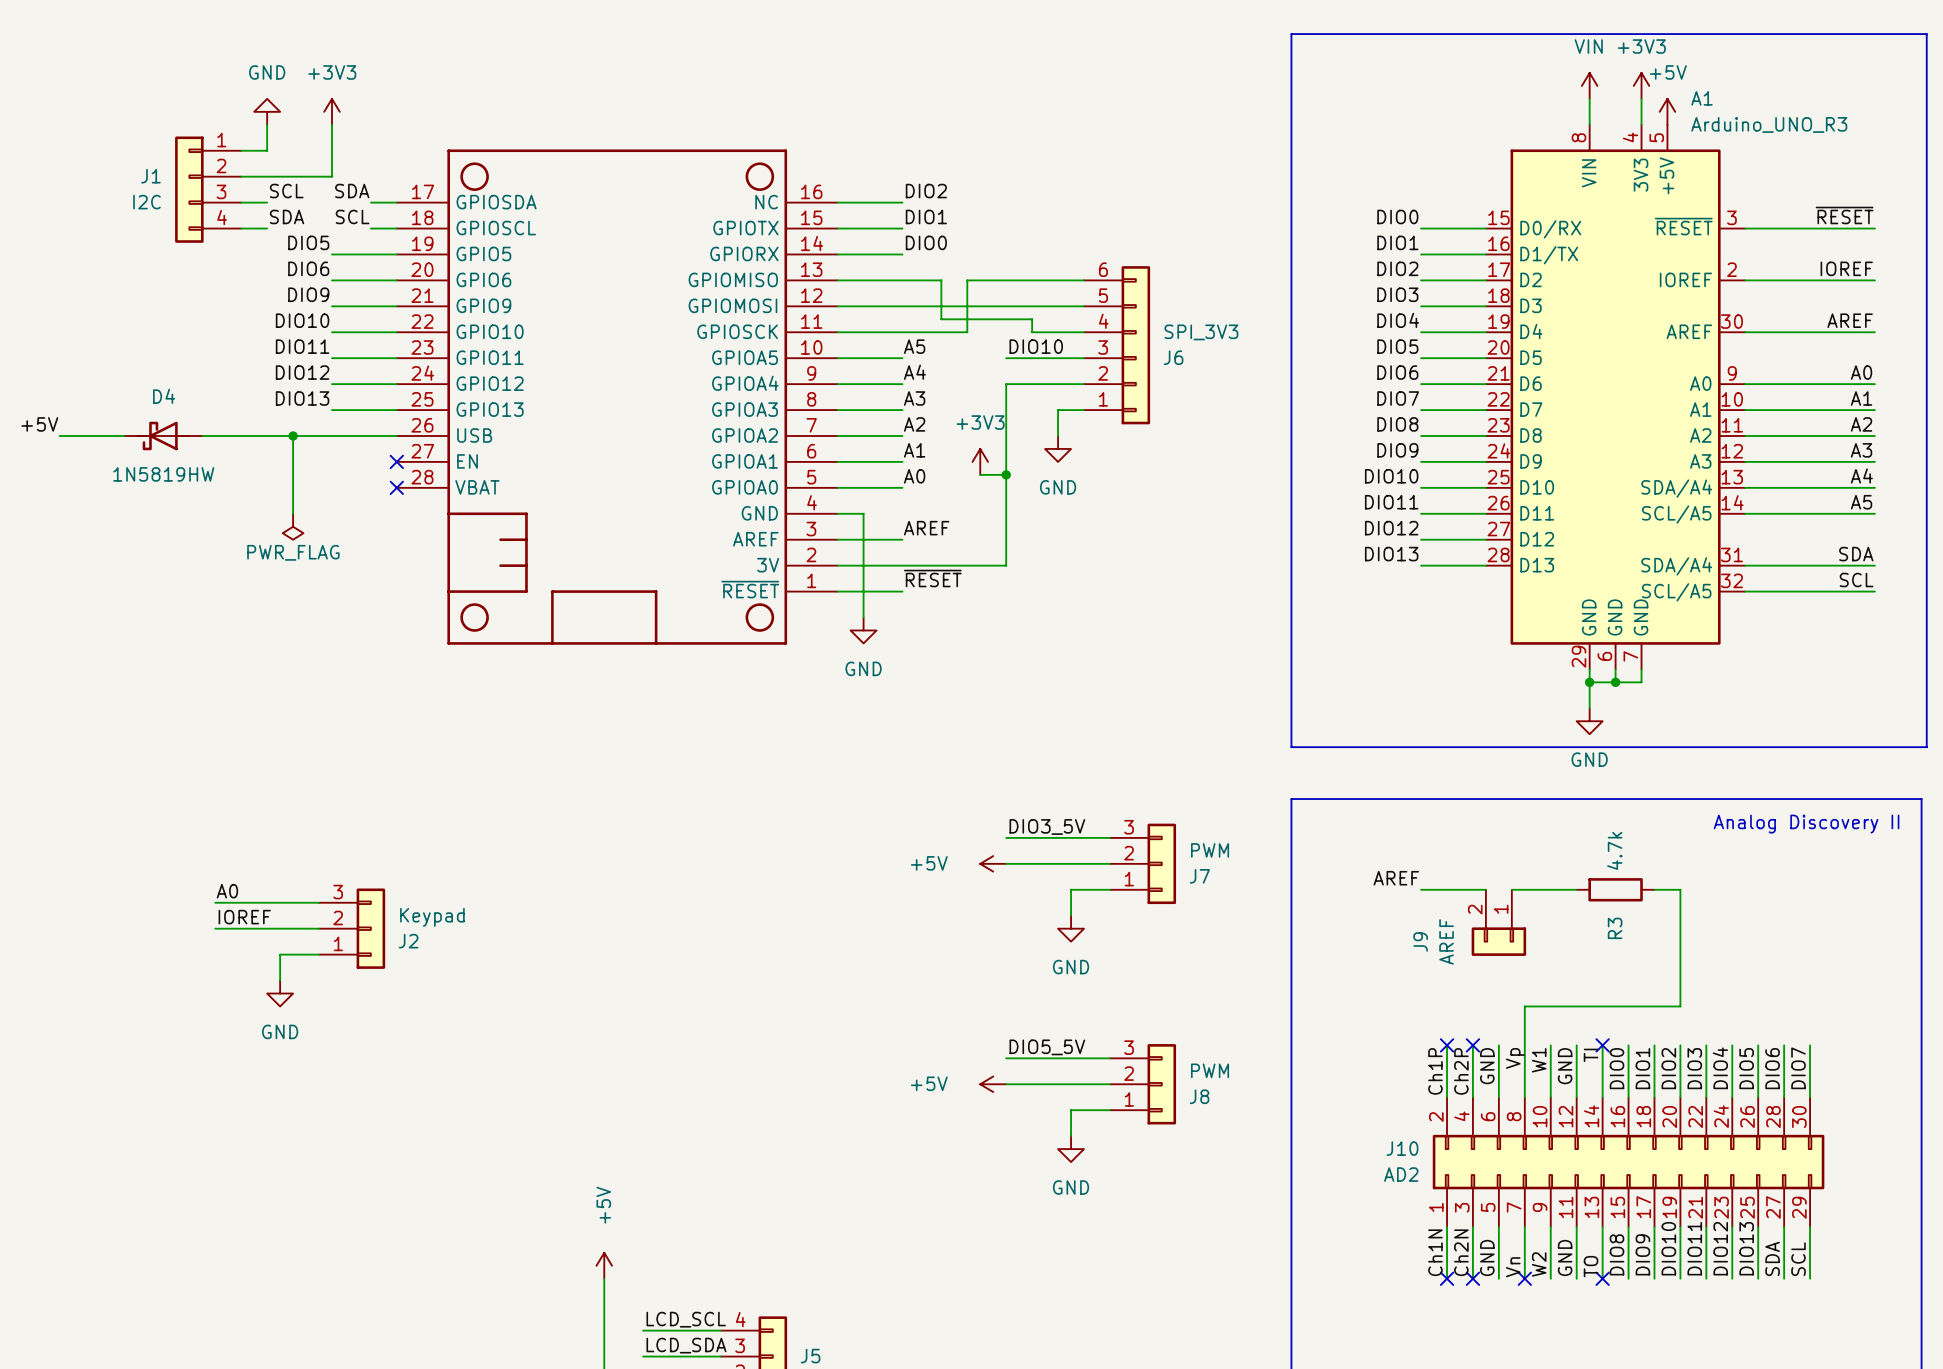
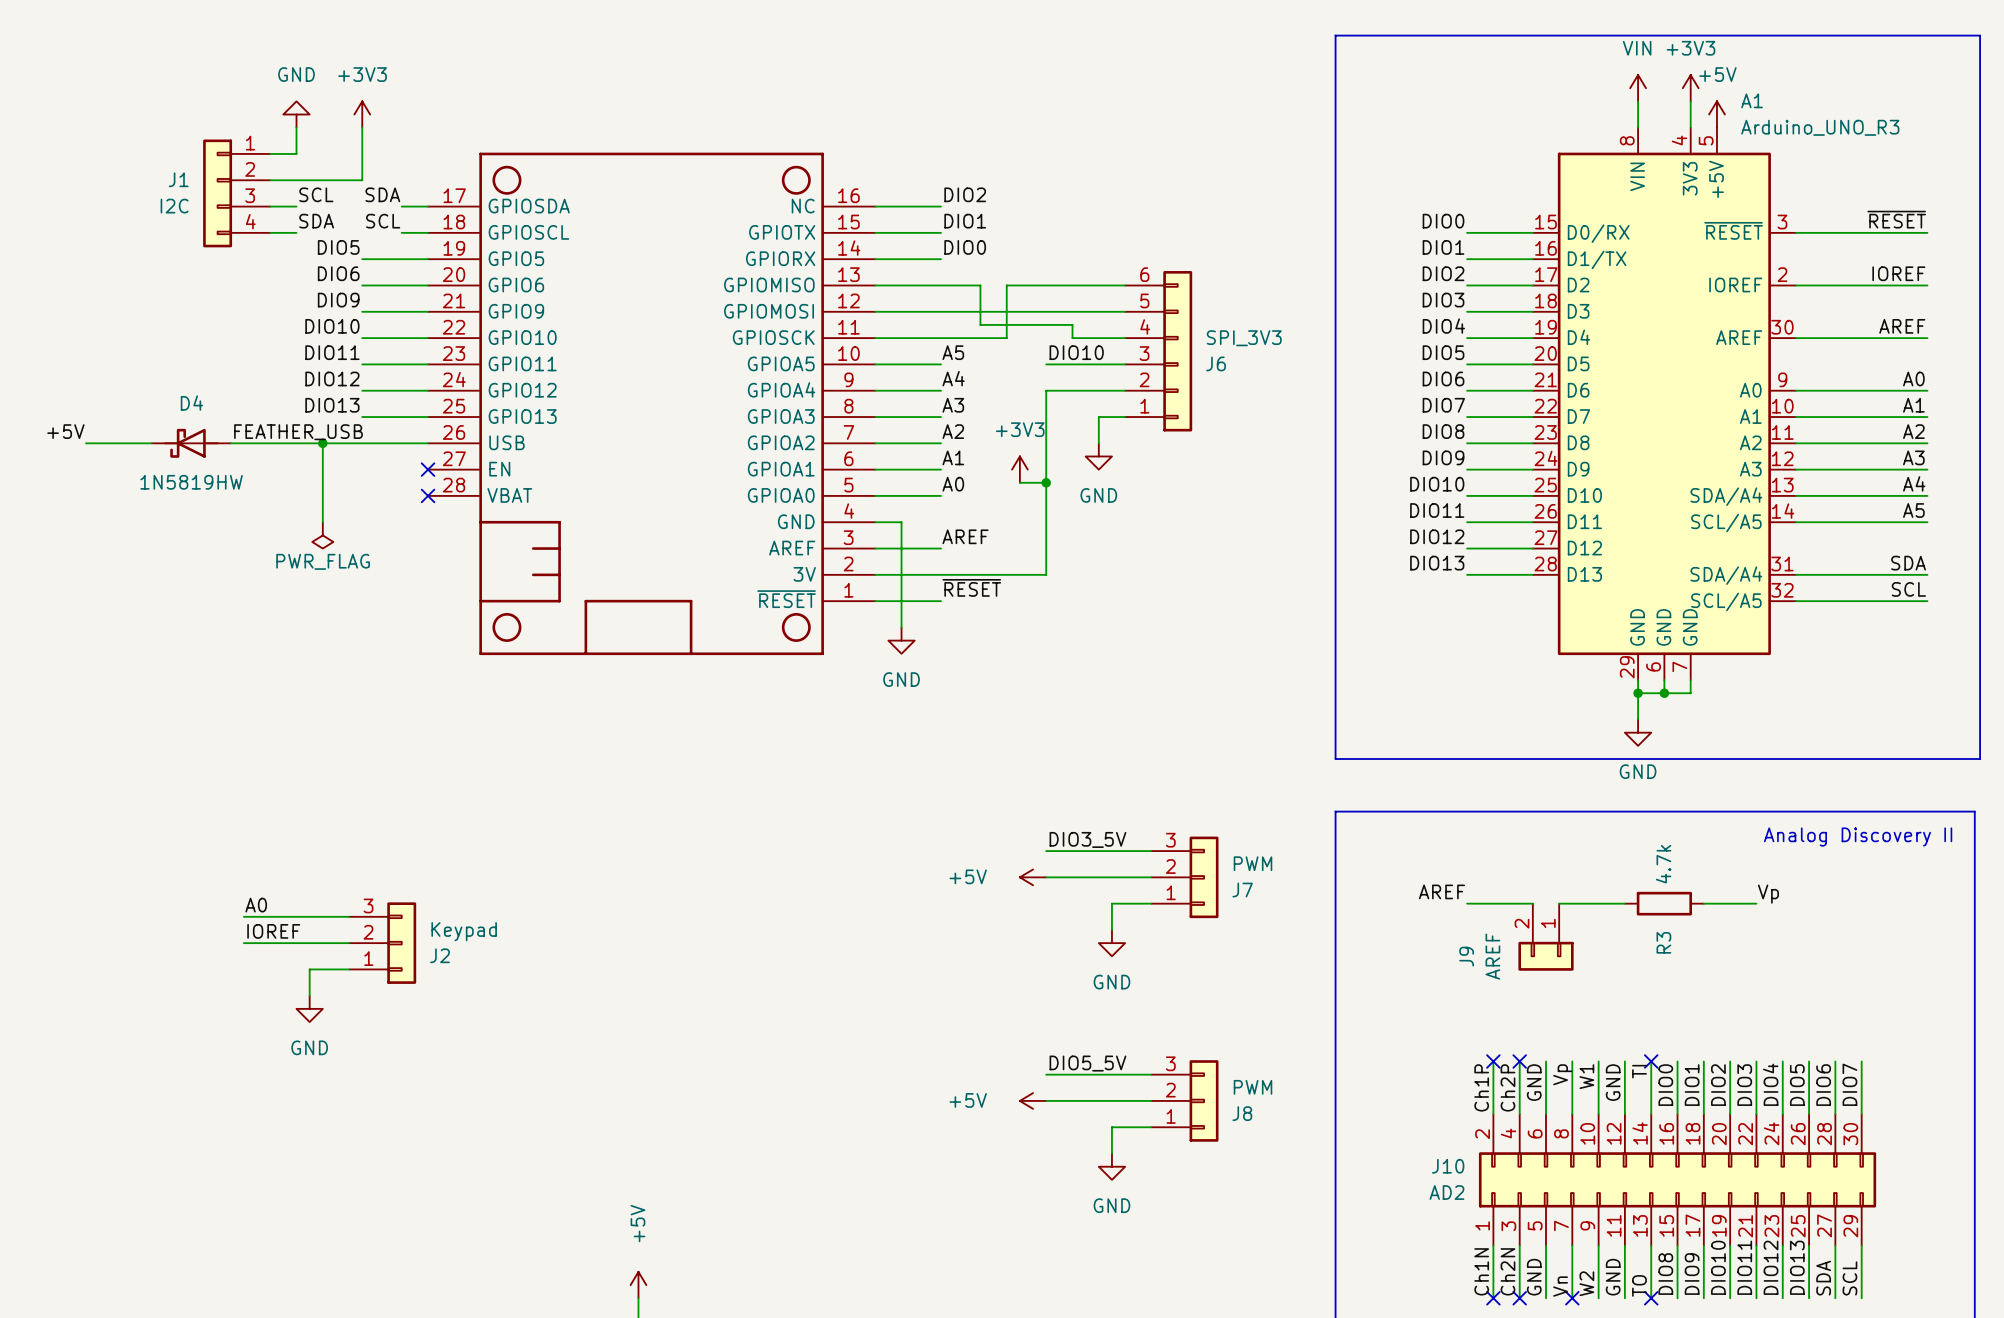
label: none -> FEATHER_USB (298, 432)
label: none -> Vp (1768, 894)
wire: (1680, 889) (1680, 1006) (1524, 1006) (1524, 1045) -> (1730, 903) (1756, 903)

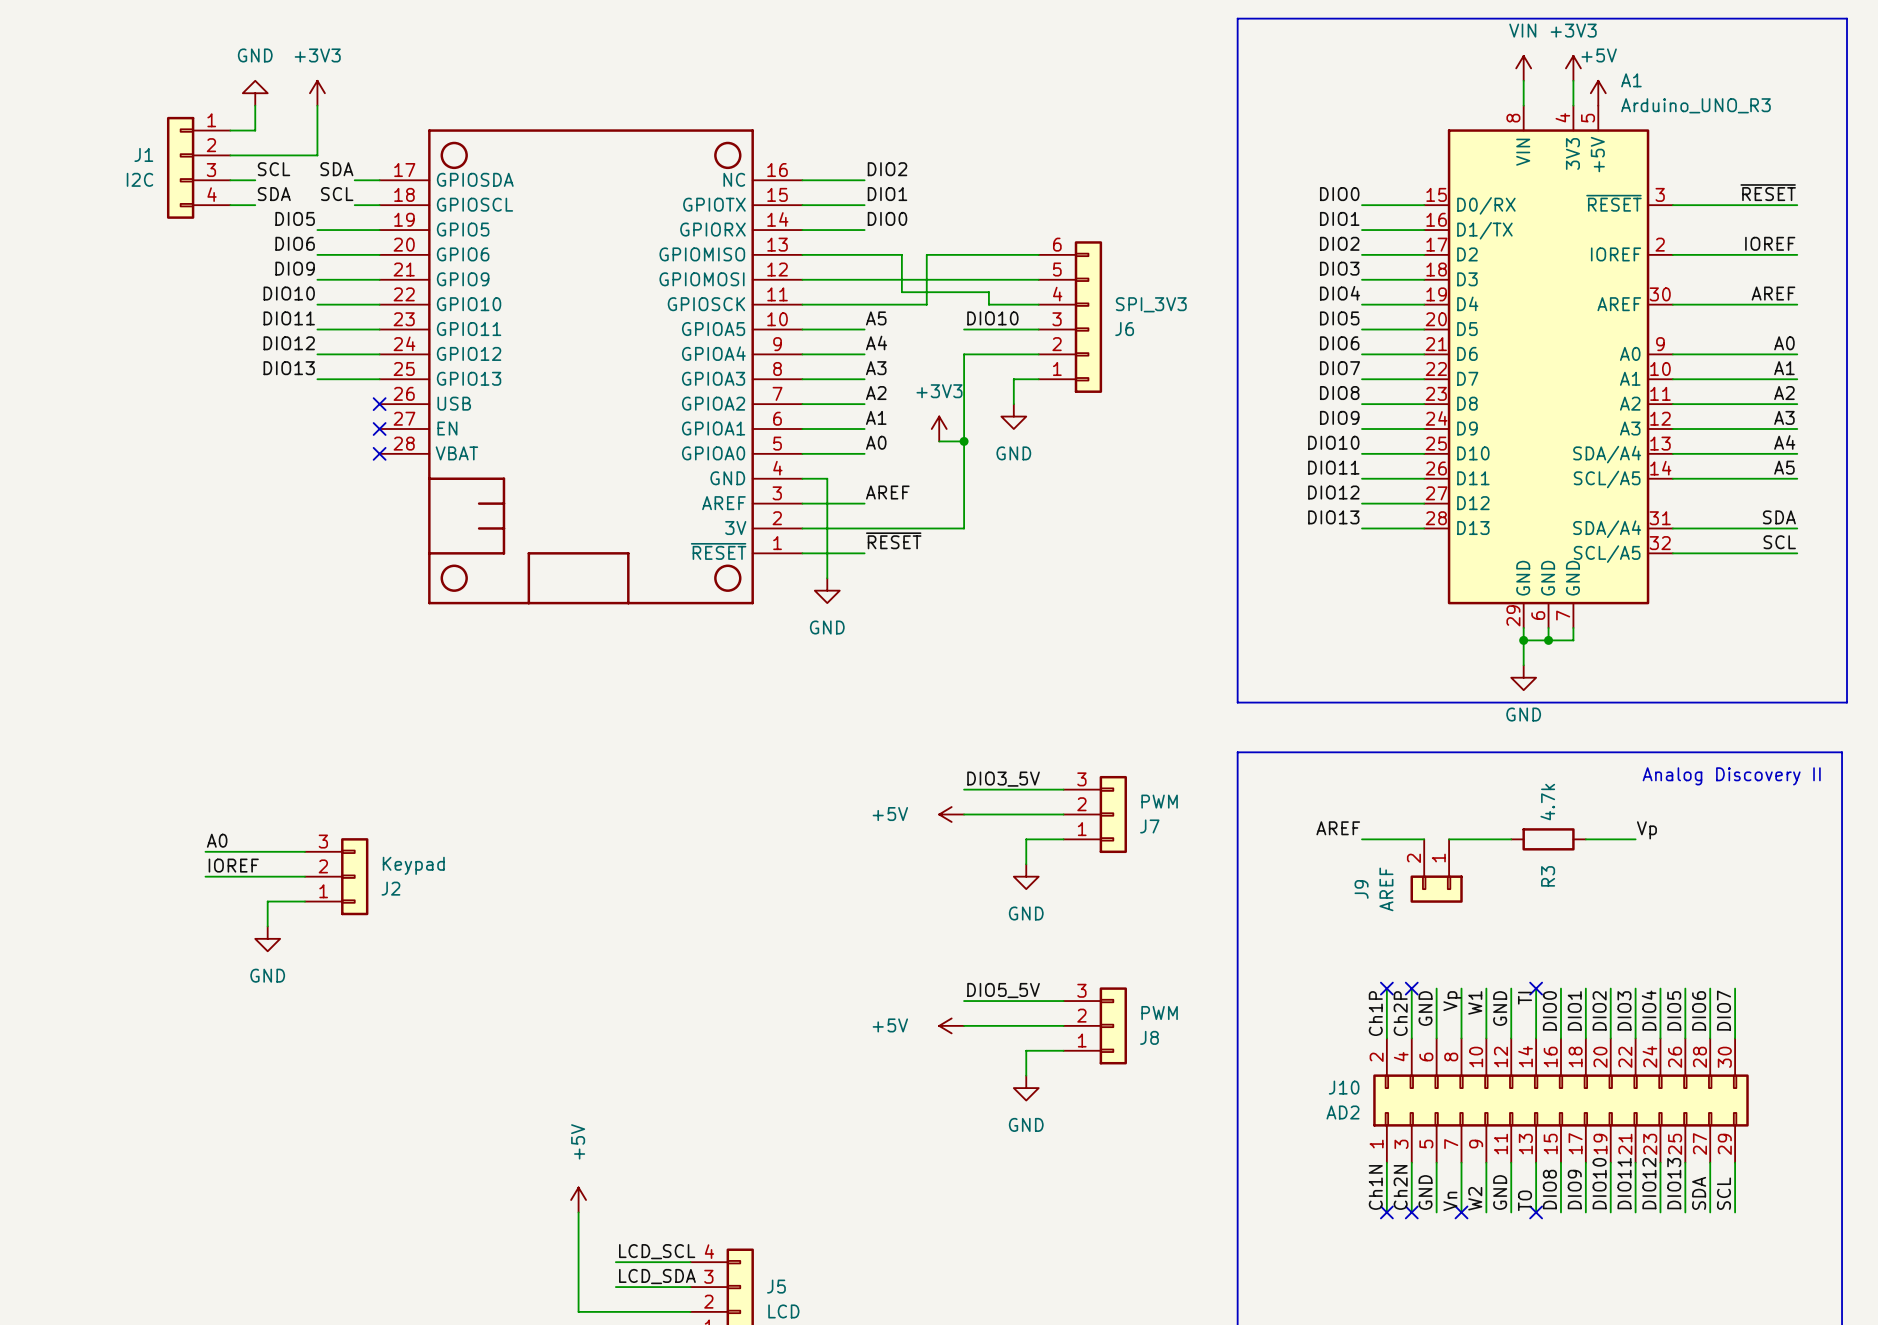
label: +5V (65, 431) -> none
label: FEATHER_USB (298, 432) -> none
wire: (86, 443) (151, 443) -> none
D4: 1N5819HW (191, 443) -> none
wire: (230, 443) (428, 443) -> none
wire: (322, 443) (322, 522) -> none
junction: (322, 443) -> none
no-connect mark: none -> (379, 404)
power symbol: PWR_FLAG (322, 535) -> none

